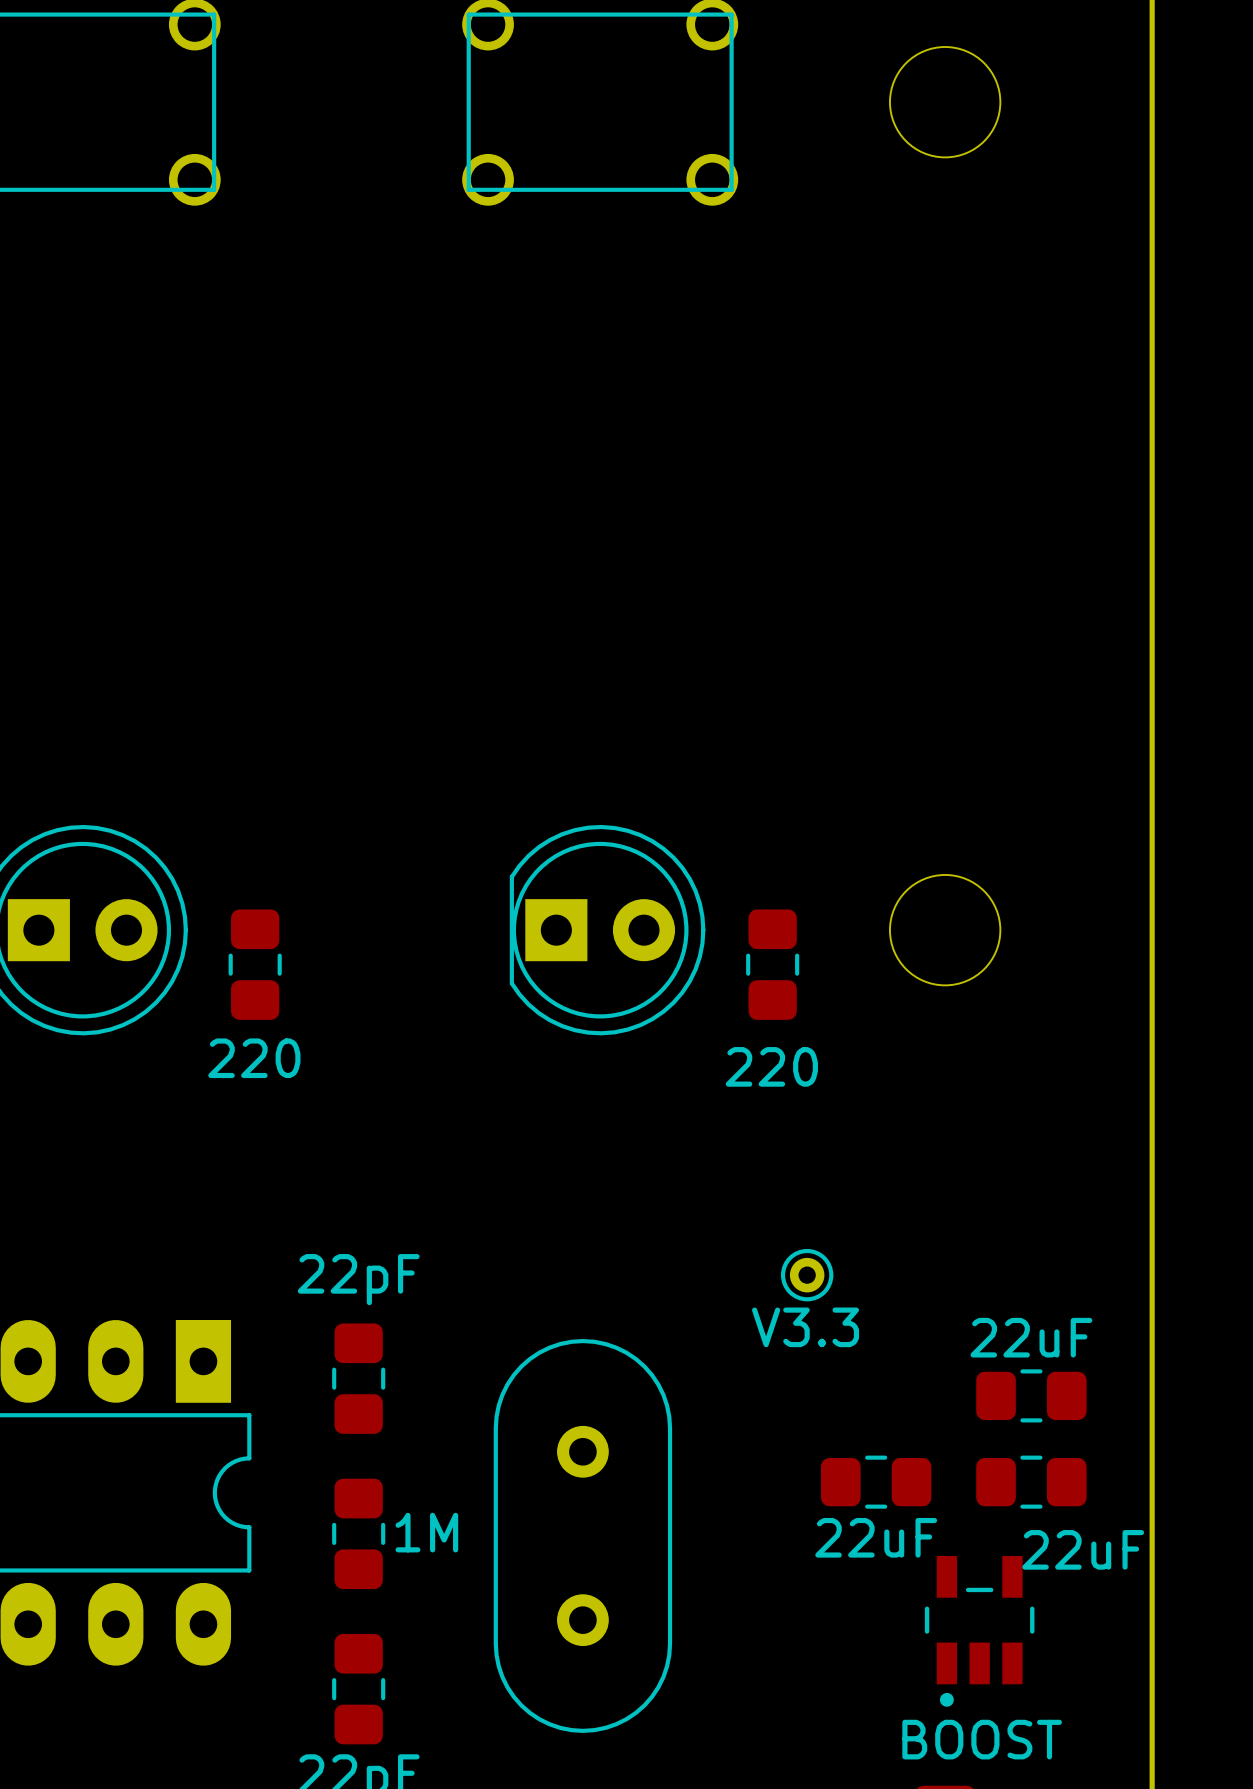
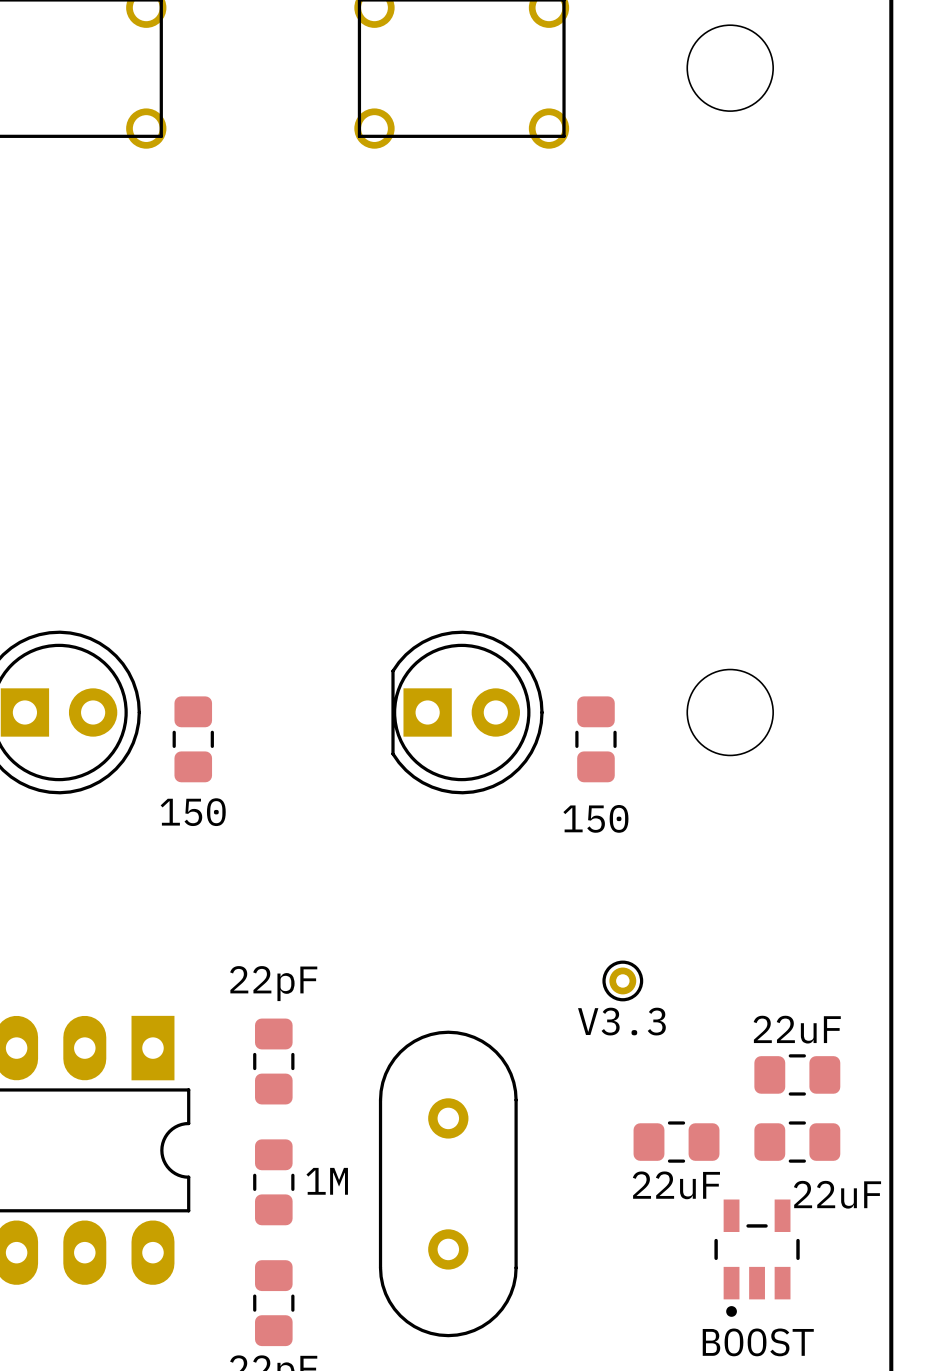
part value: 220 (254, 1058) -> 150 (193, 812)
part value: 220 (771, 1066) -> 150 (595, 818)

